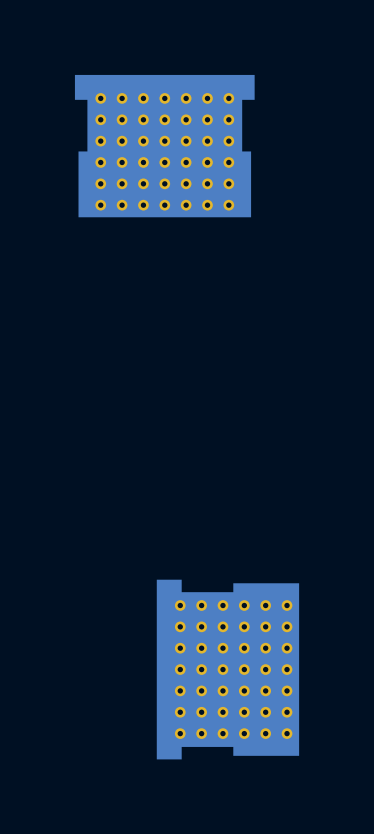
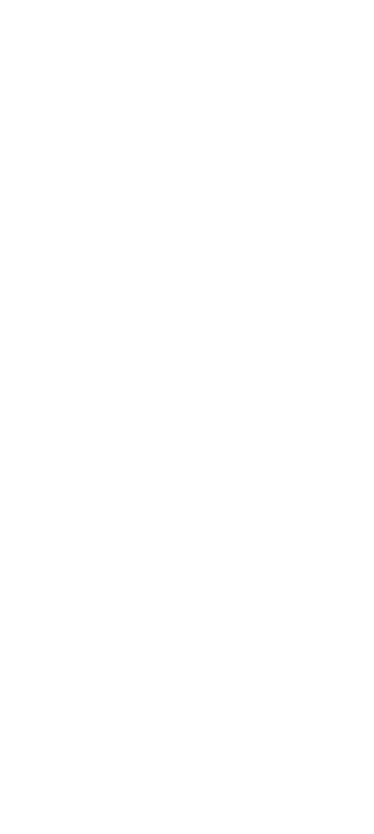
part: (164, 146) -> none
part: (227, 669) -> none

